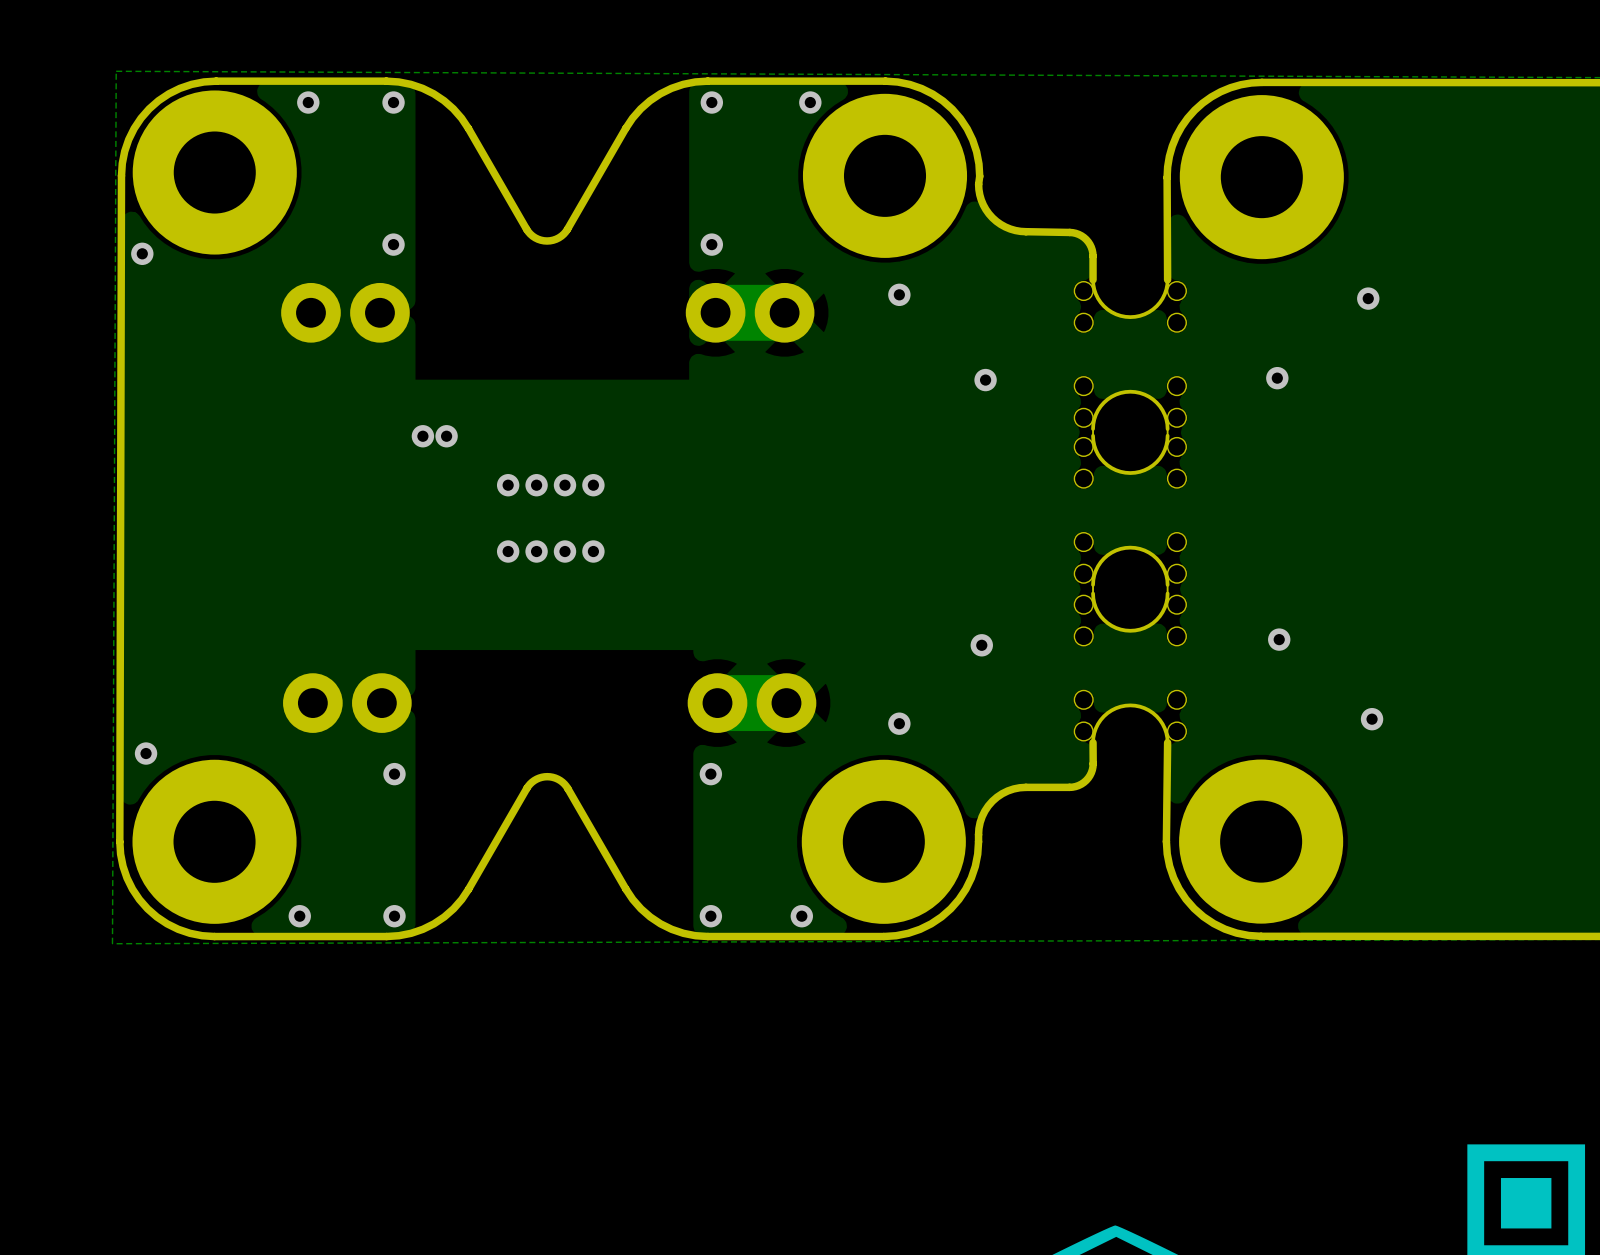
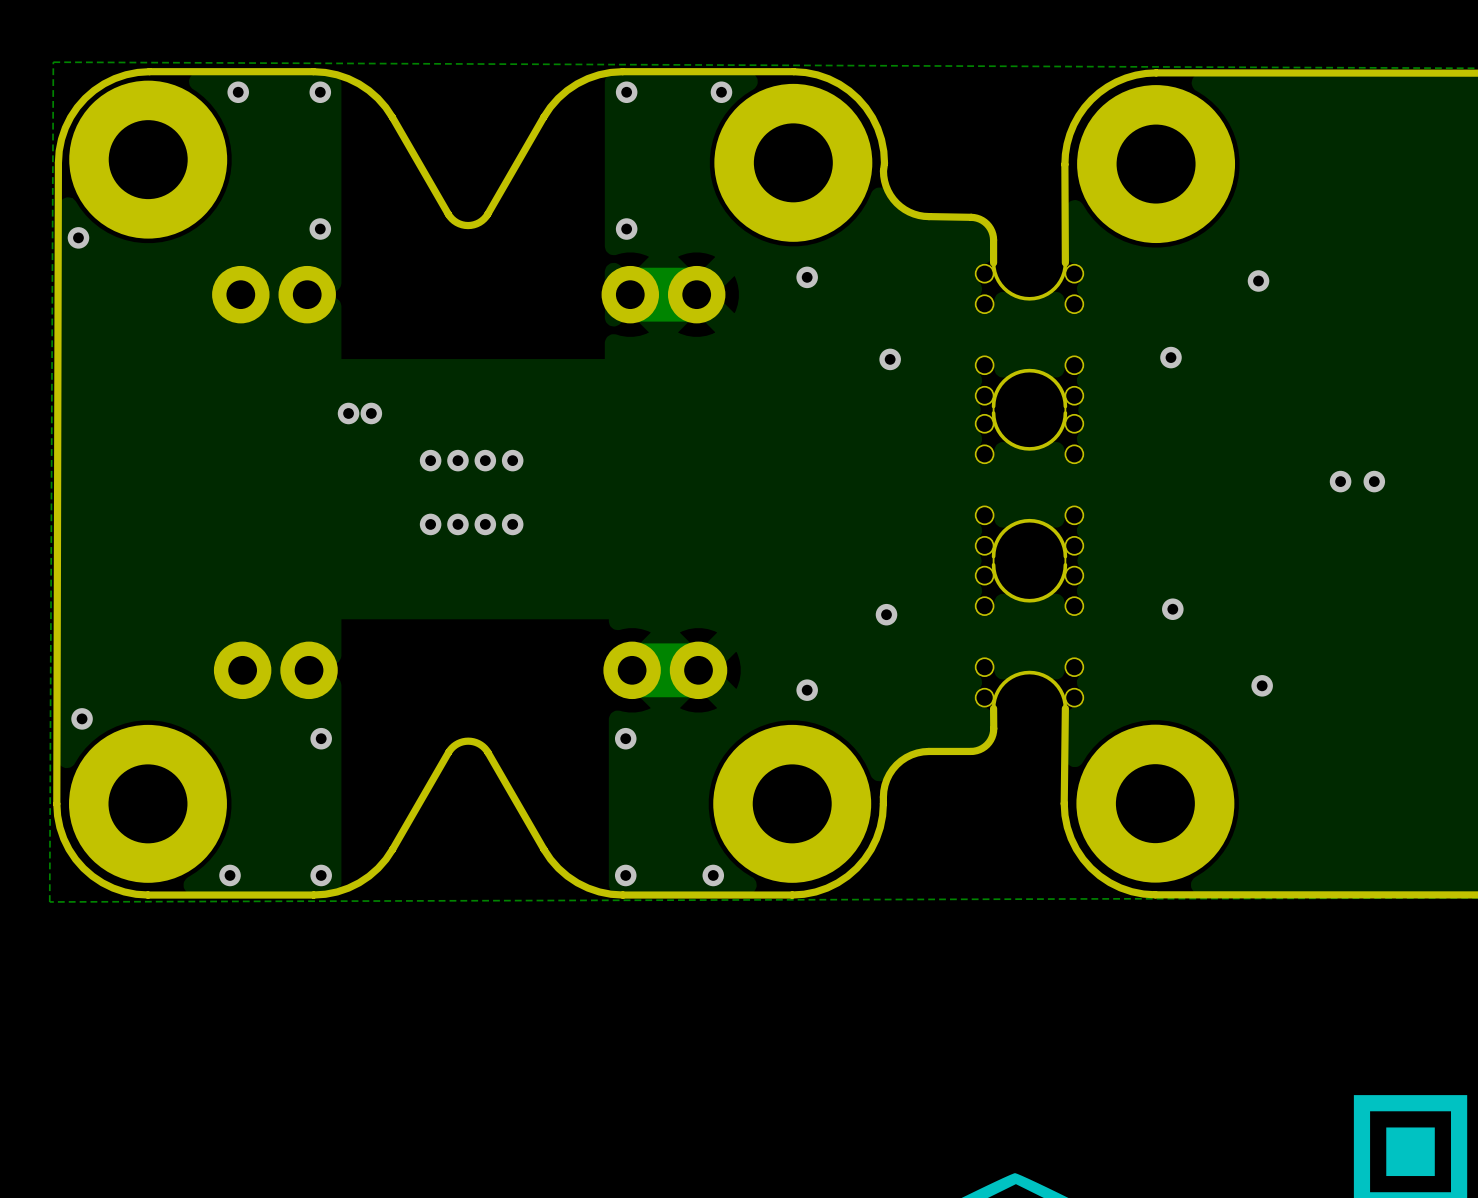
via: none -> (1340, 481)
via: none -> (1374, 481)

